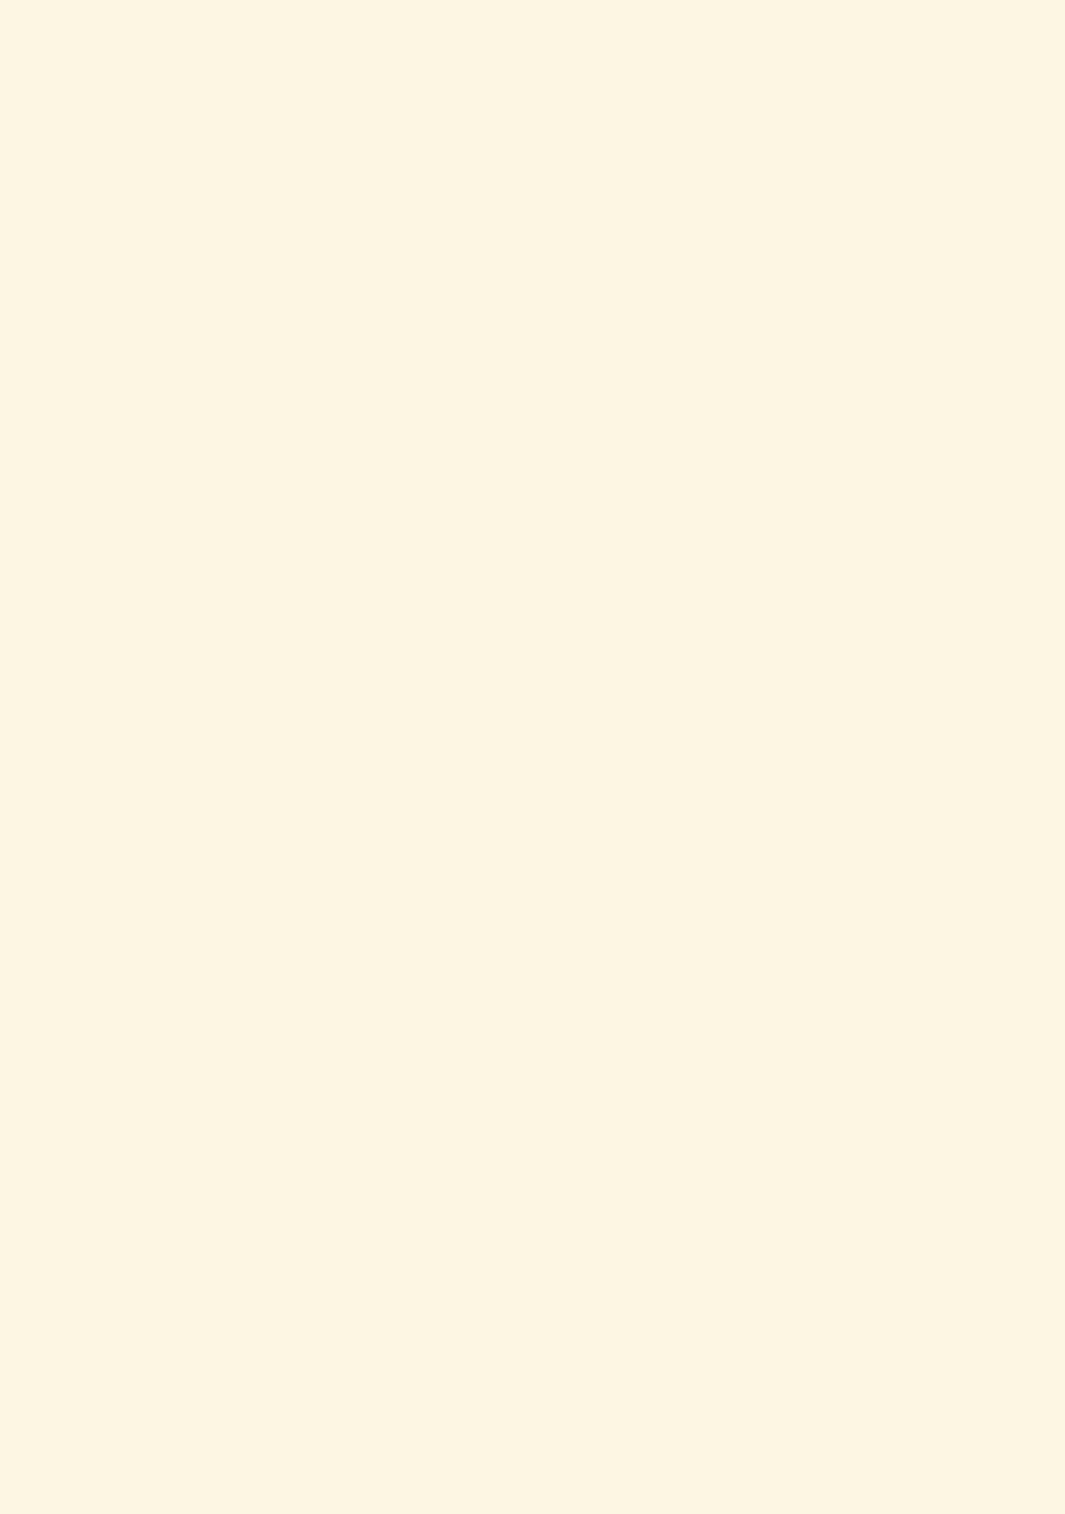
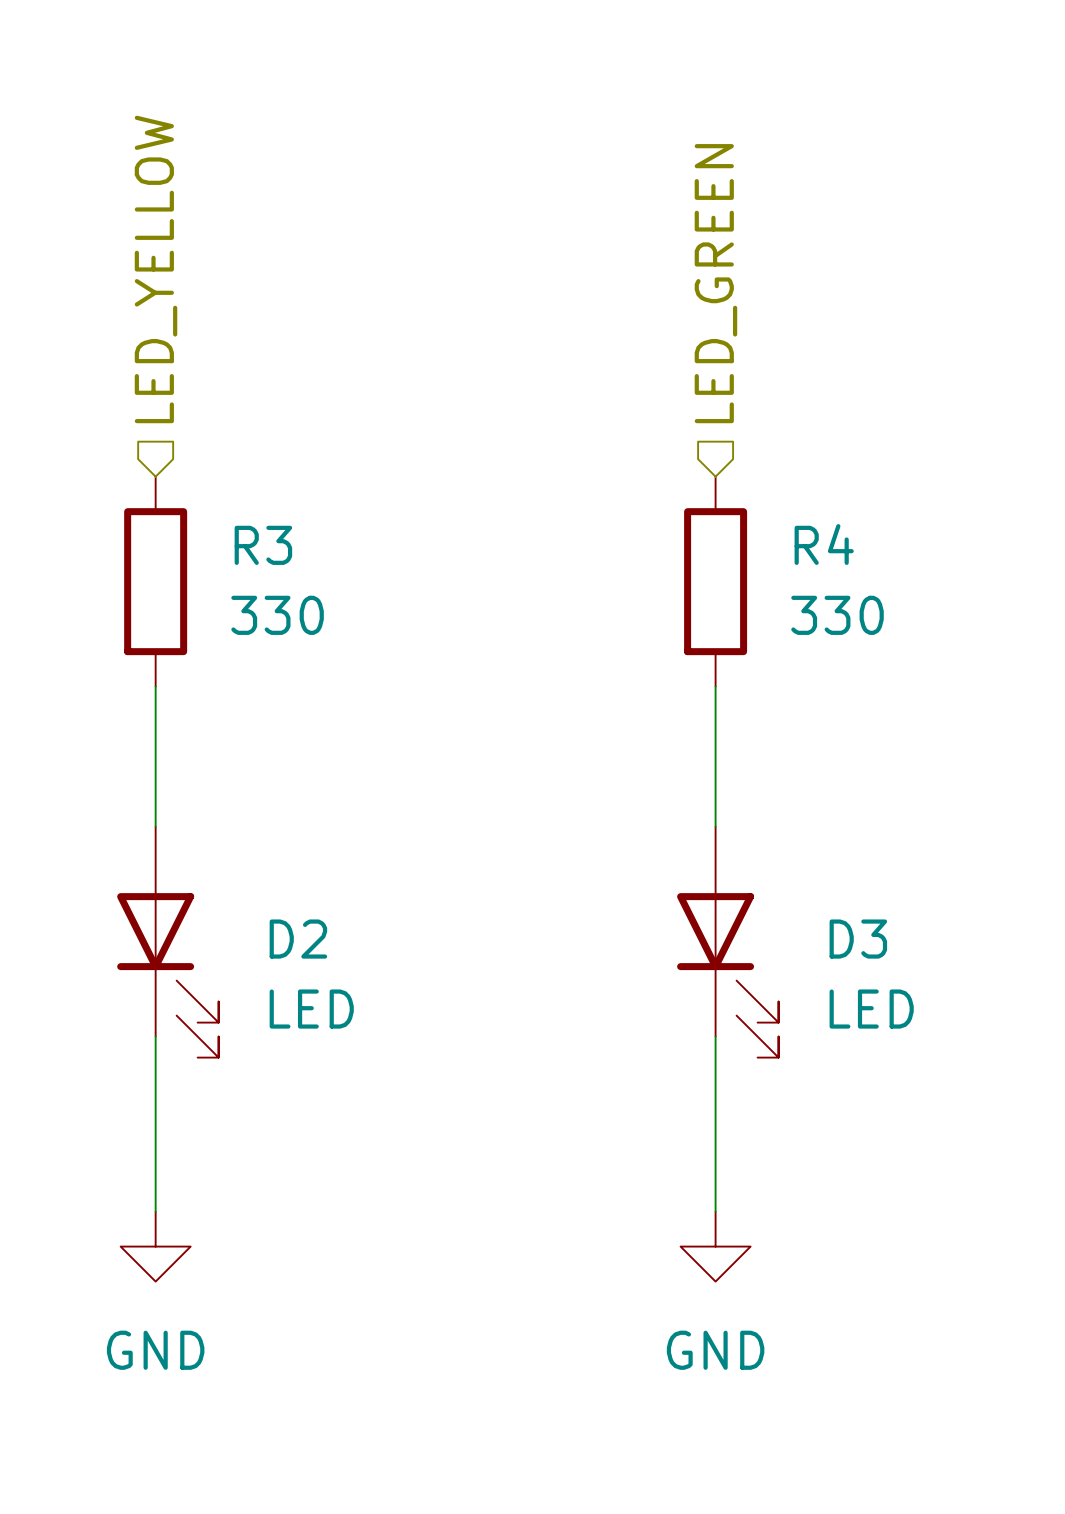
hierarchical label: none -> LED_YELLOW (156, 269)
hierarchical label: none -> LED_GREEN (715, 283)
R3: none -> 330 (155, 581)
R4: none -> 330 (715, 581)
wire: none -> (155, 686) (155, 826)
wire: none -> (715, 686) (715, 826)
D2: none -> LED (167, 942)
D3: none -> LED (727, 942)
wire: none -> (155, 1036) (155, 1211)
wire: none -> (715, 1036) (715, 1211)
power symbol: none -> GND (155, 1246)
power symbol: none -> GND (715, 1246)

